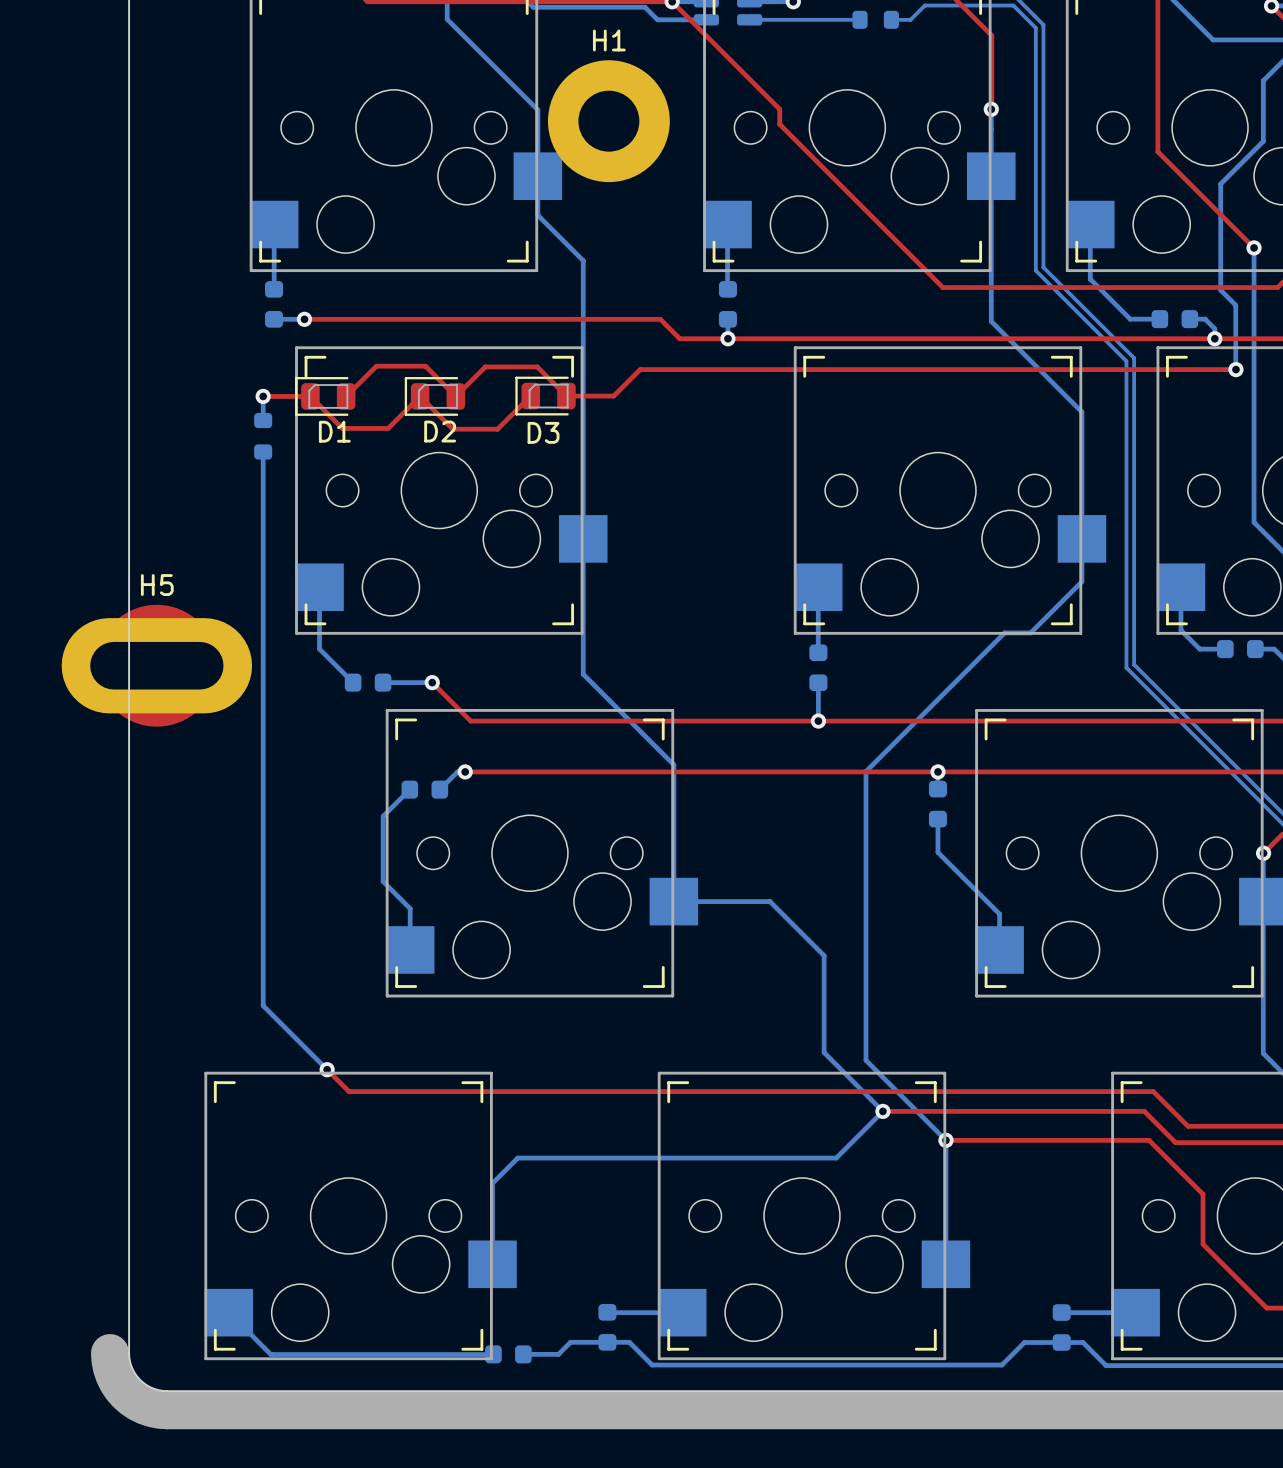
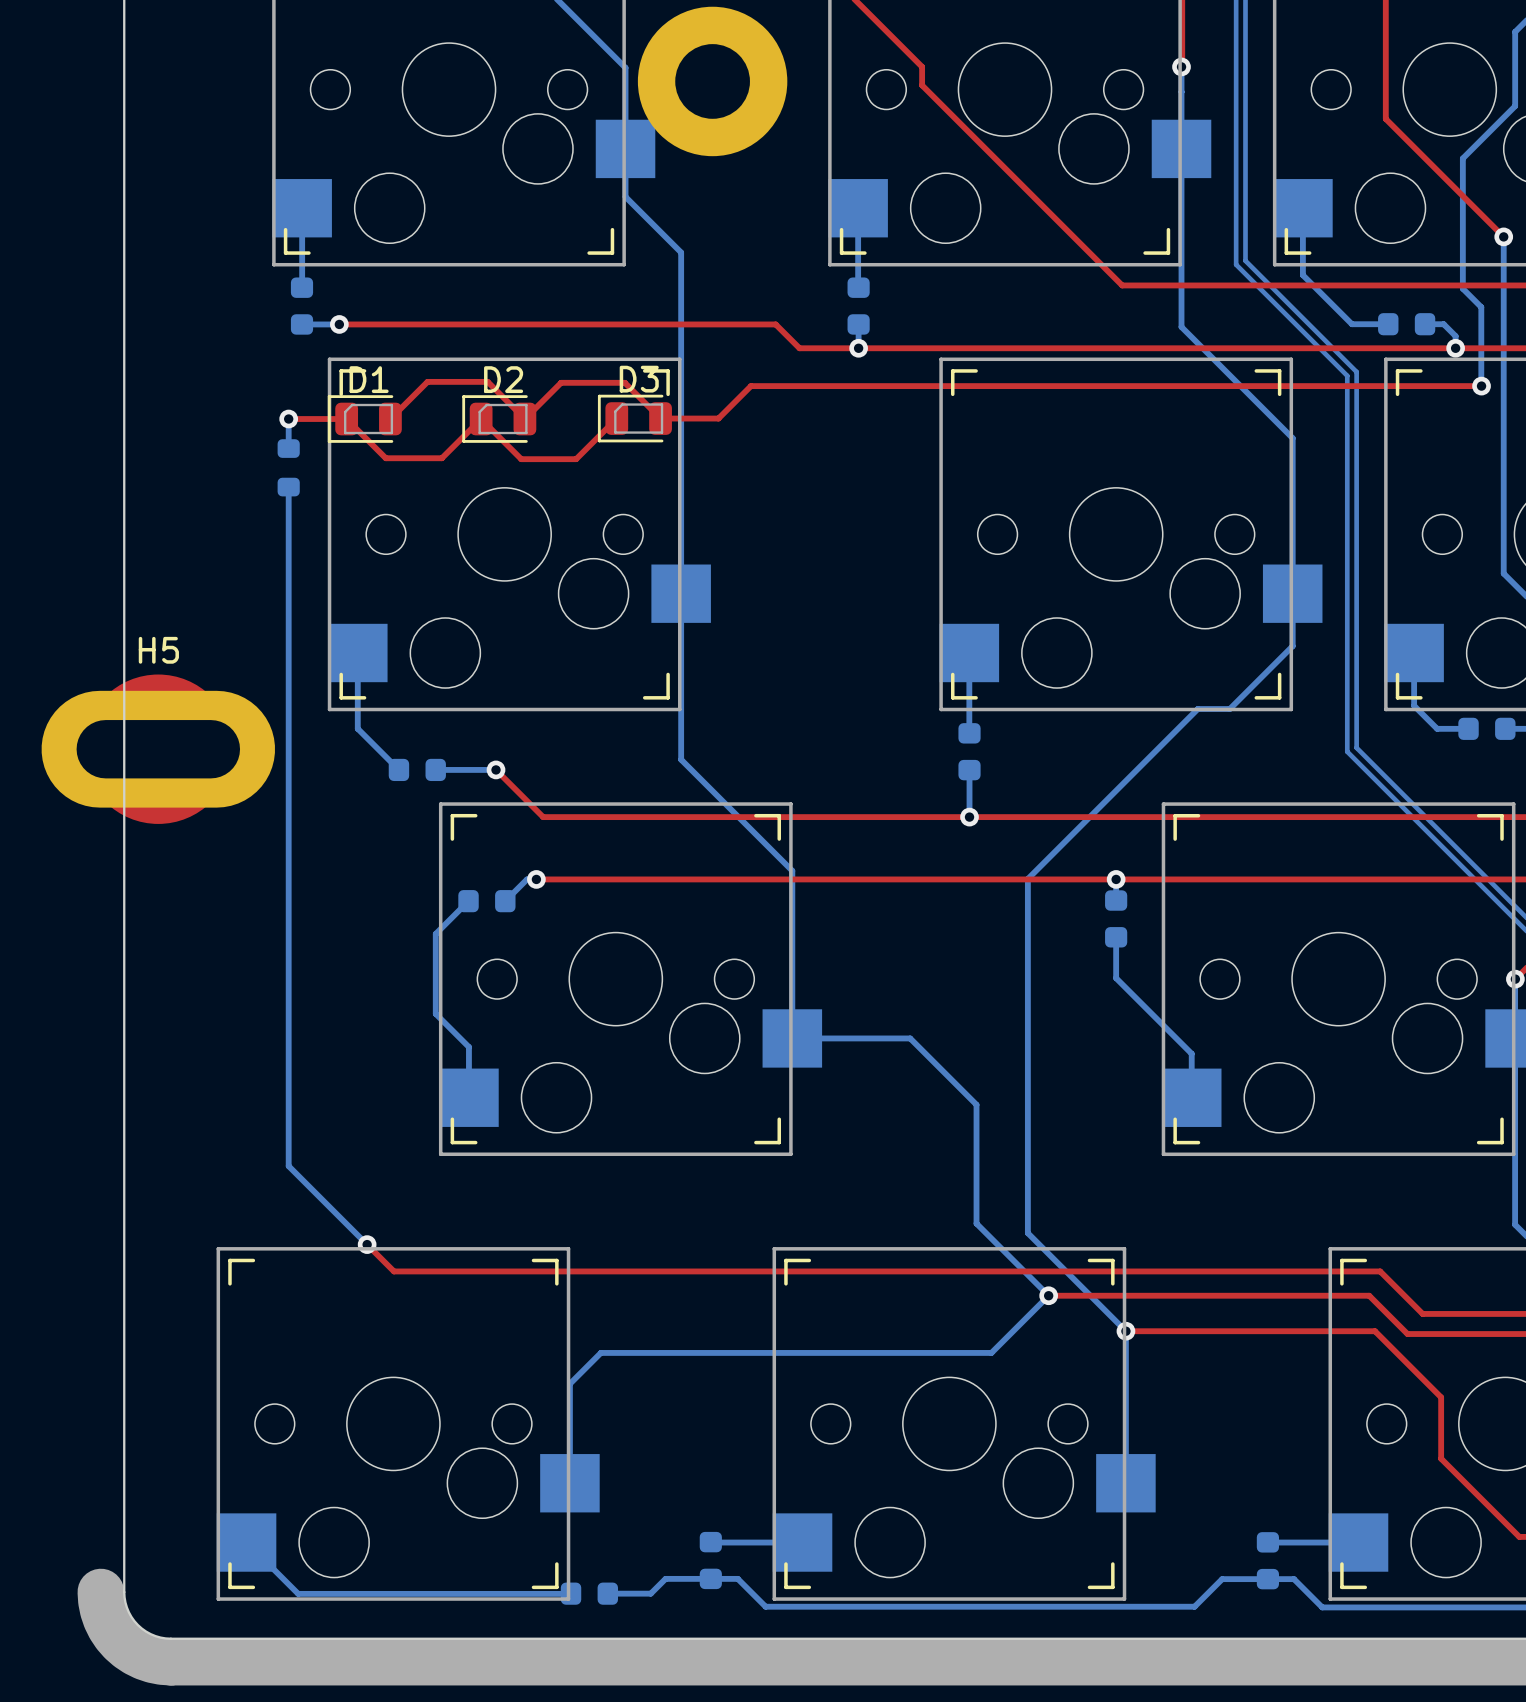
D1 name position: D1 (334, 431) -> D1 (369, 379)
D2 name position: D2 (440, 431) -> D2 (503, 379)
D3 name position: D3 (543, 432) -> D3 (639, 379)

